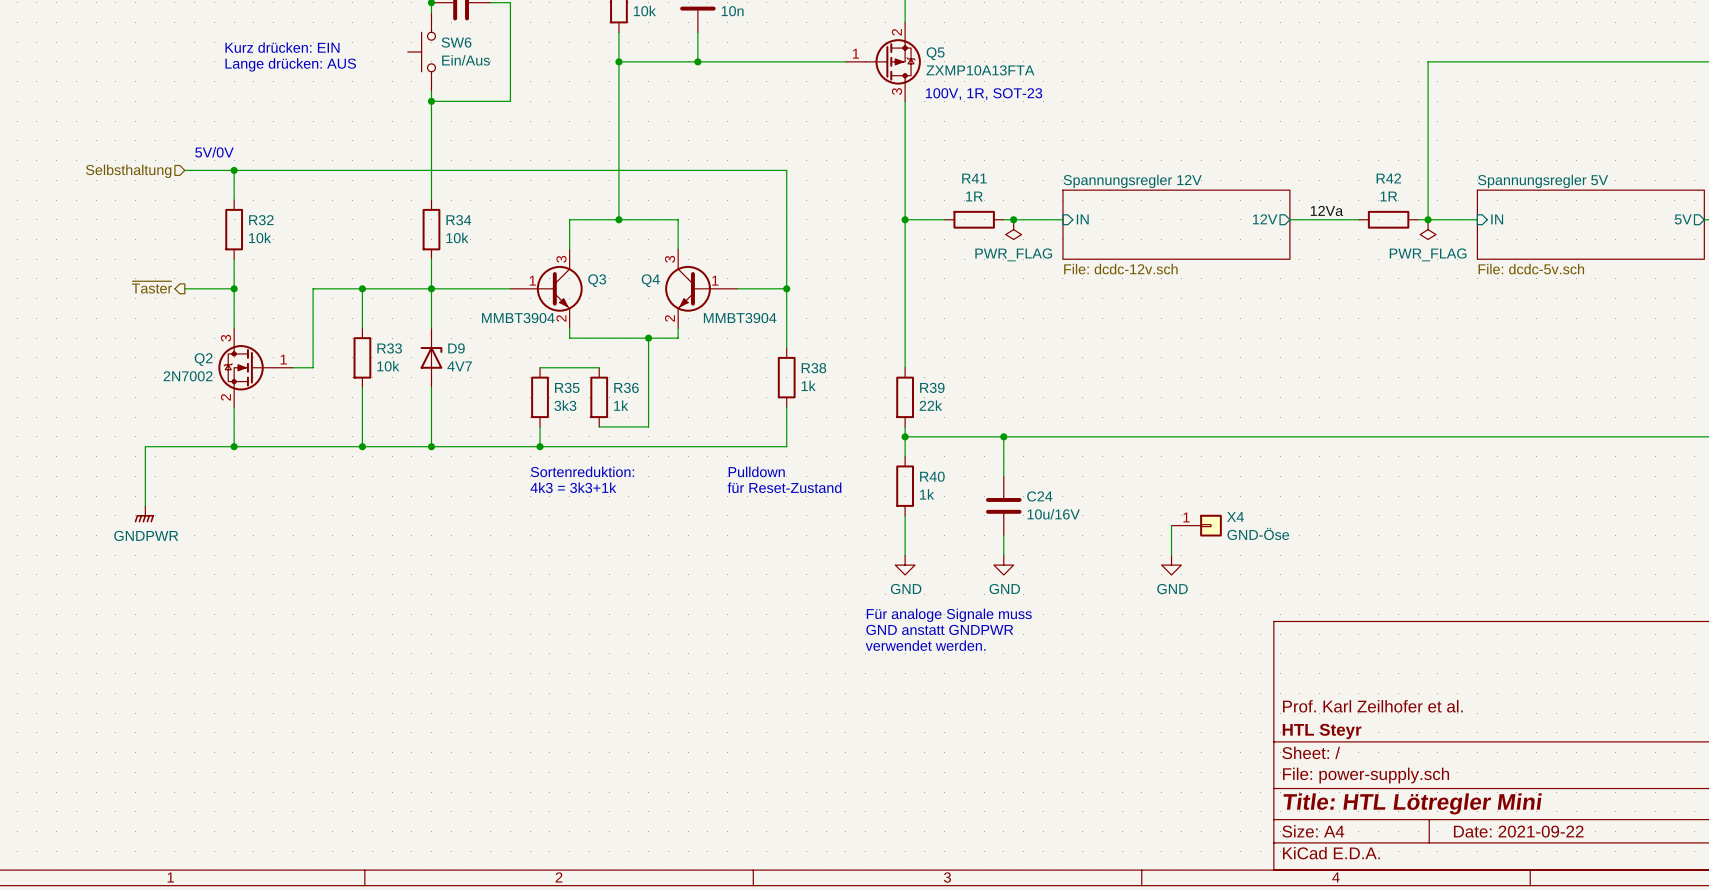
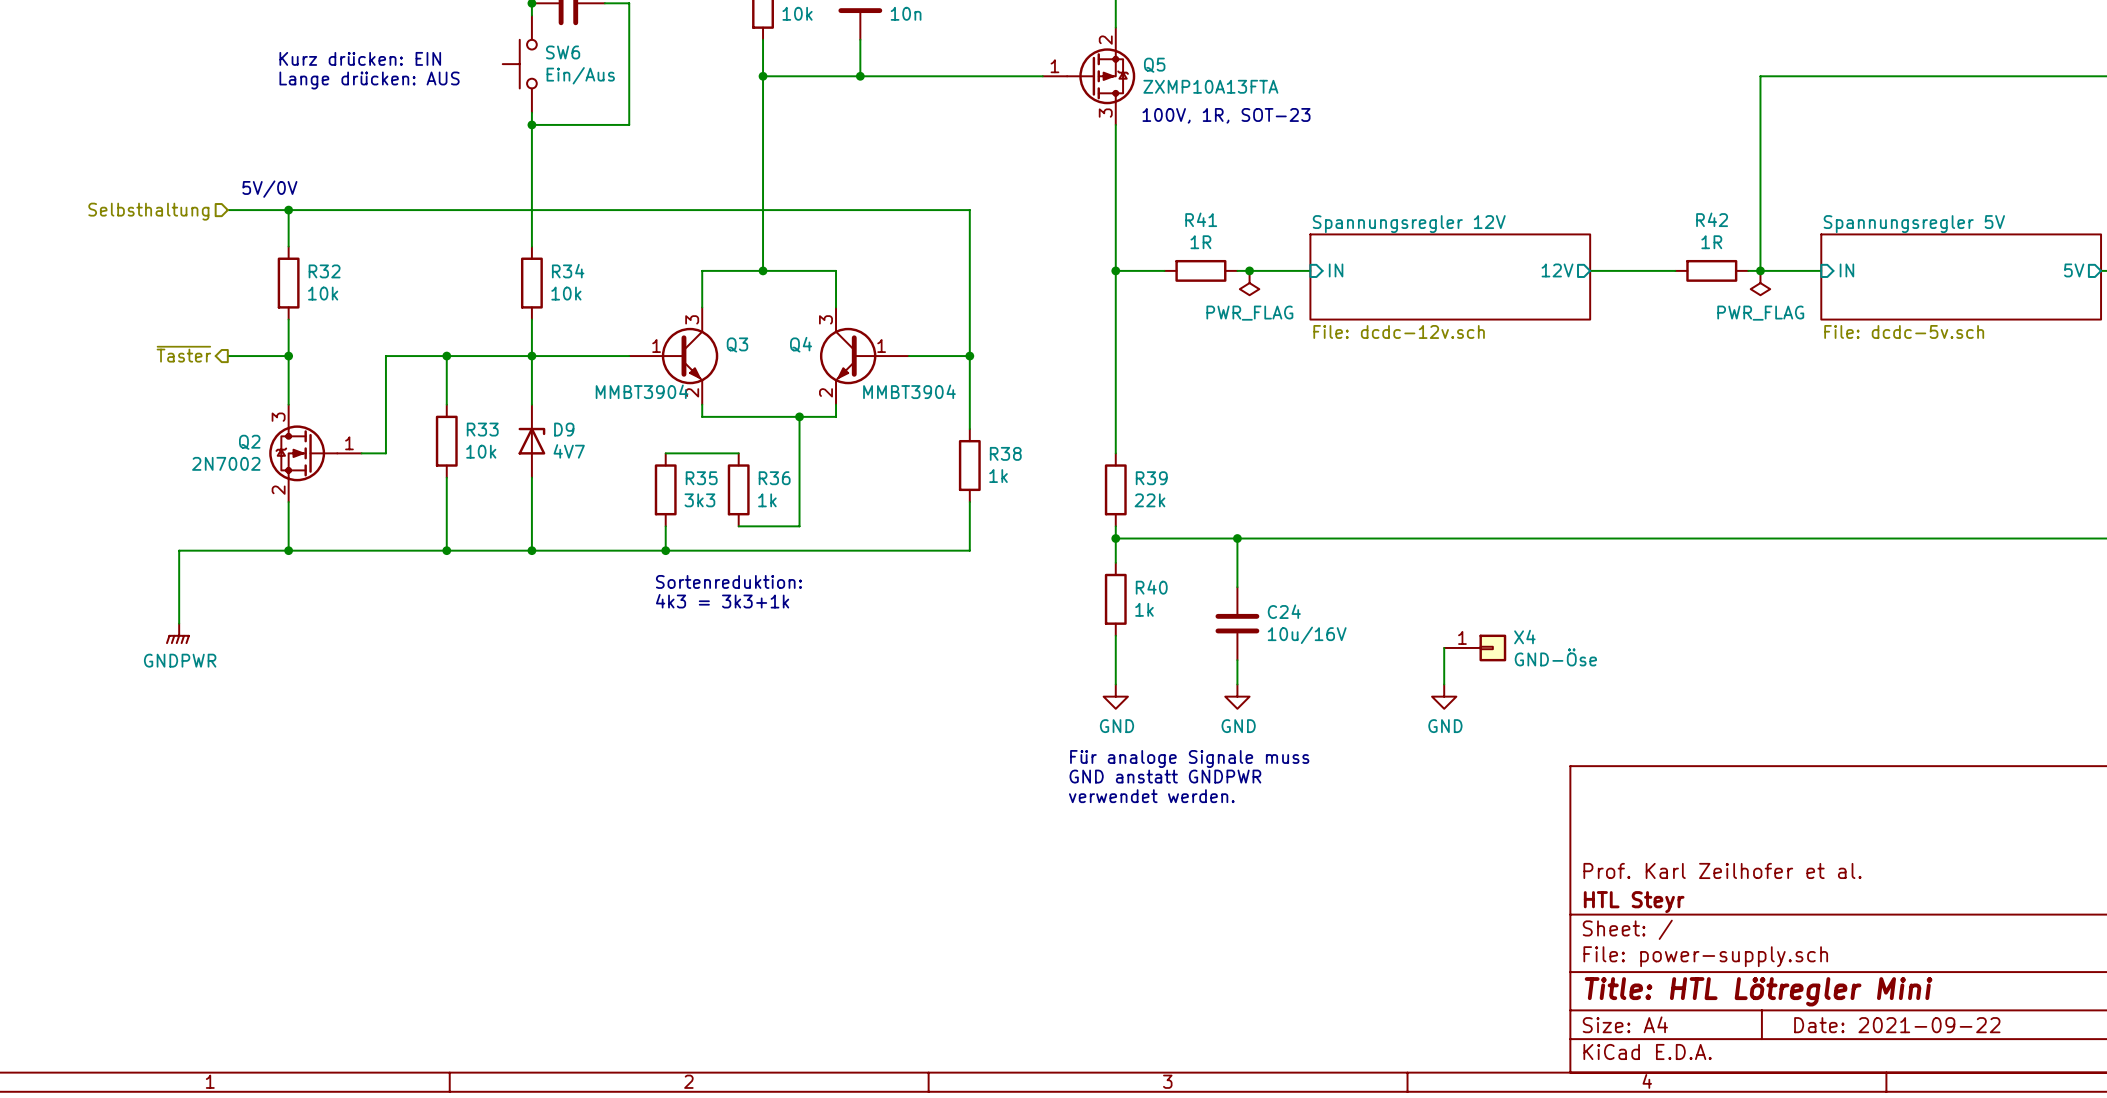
label: 12Va (1326, 210) -> none
text: Pulldown (756, 471) -> none
text: für Reset-Zustand (784, 487) -> none

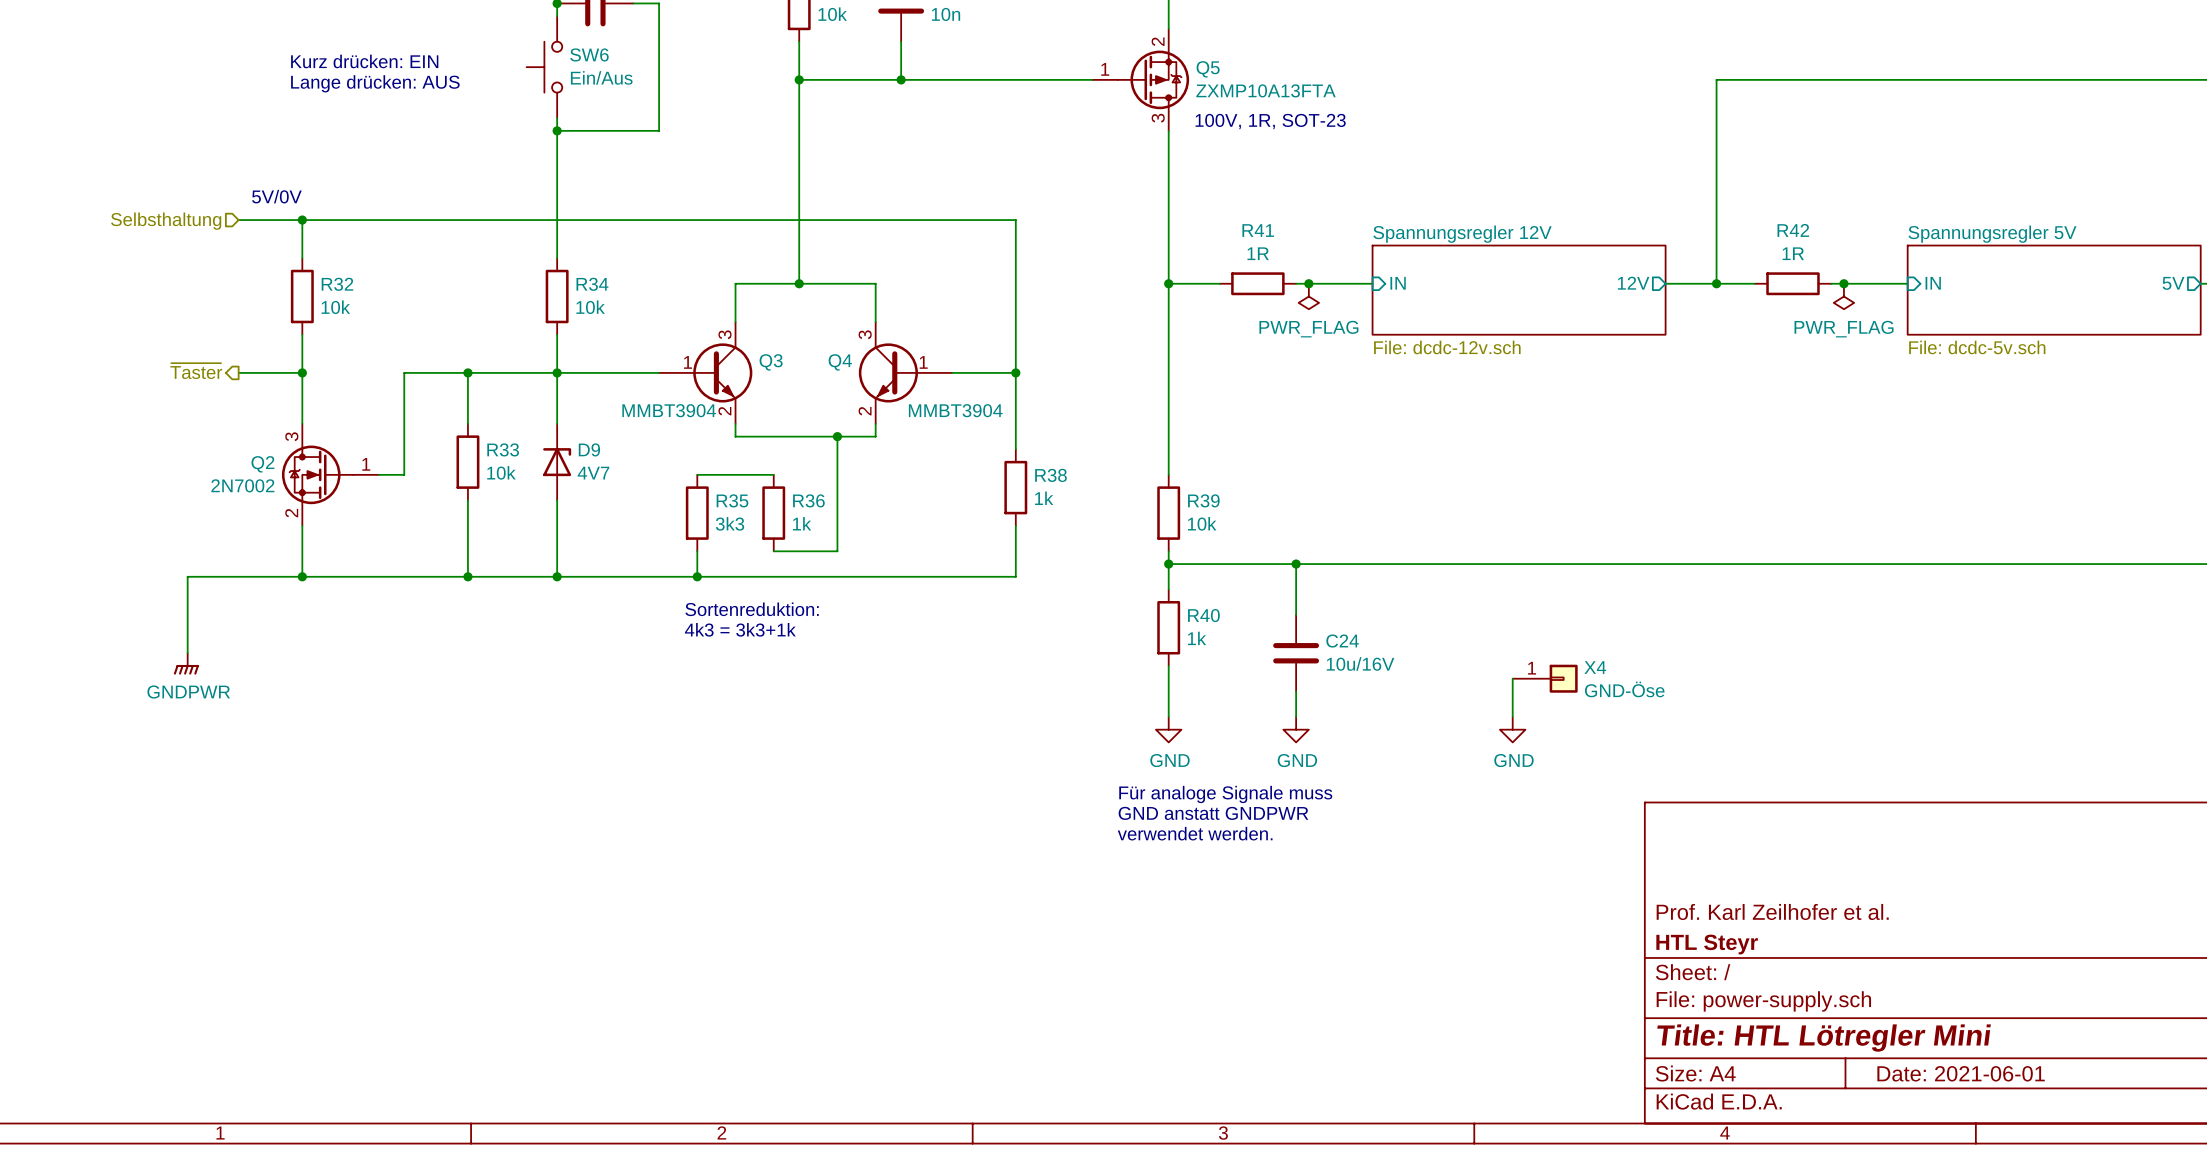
wire: (1760, 76) (1760, 270) -> (1843, 79) (1716, 79) (1716, 283)
junction: none -> (1716, 283)
R39 value: 22k (1149, 500) -> 10k (1202, 523)
title block: Date: 2021-09-22 (1897, 1025) -> Date: 2021-06-01 (1961, 1073)

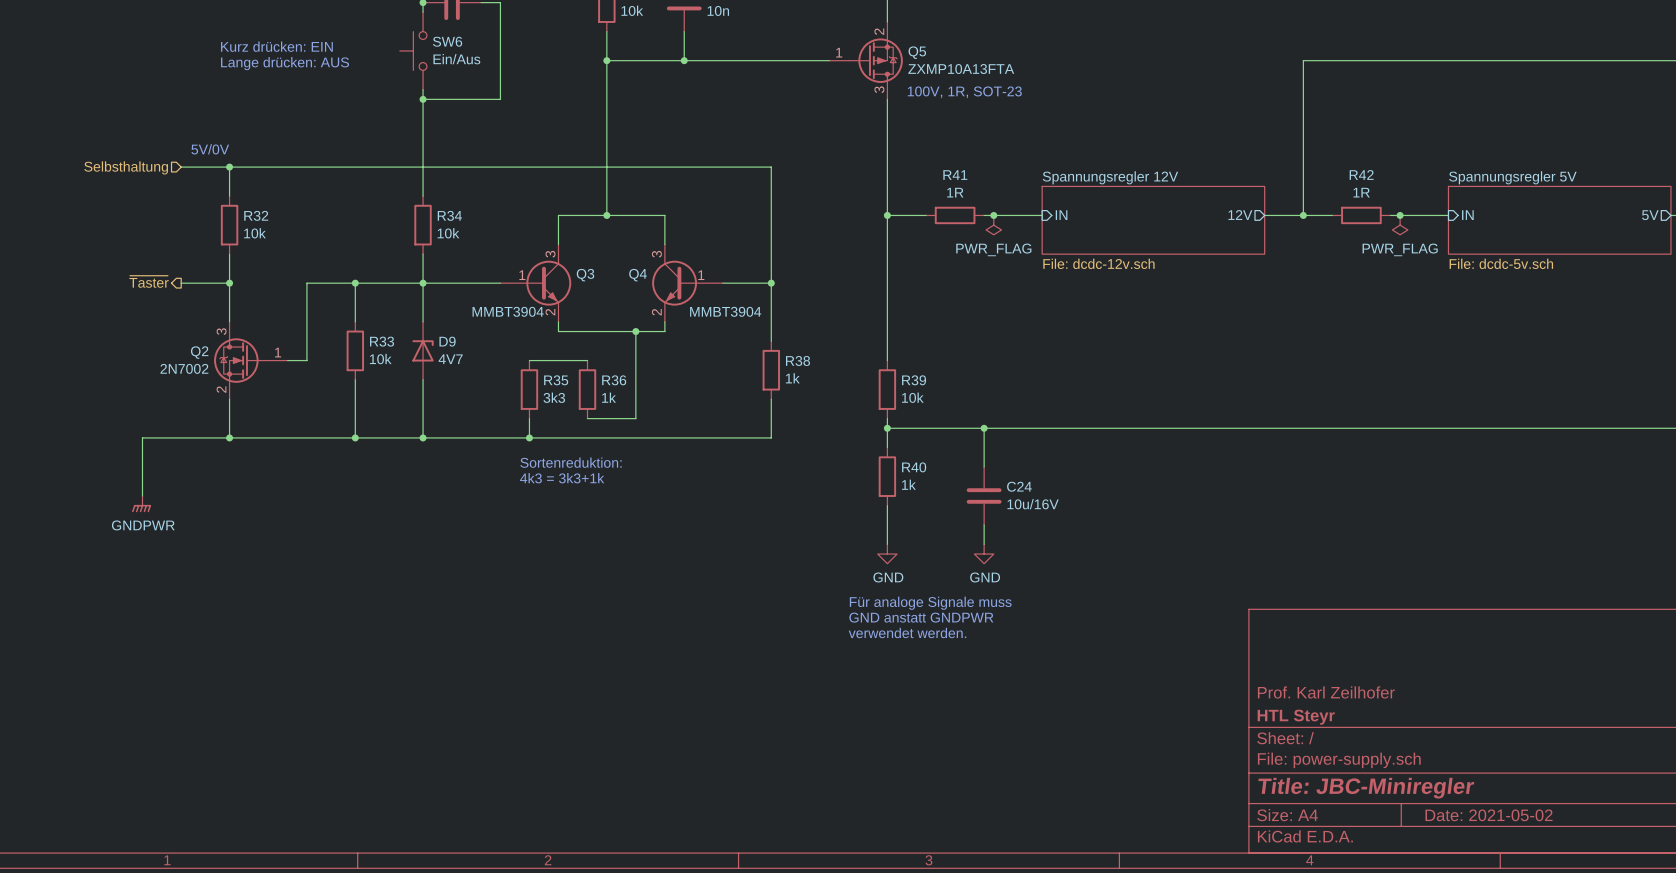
wire: (1512, 678) (1512, 716) -> none
X4: GND-Öse (1545, 678) -> none
power symbol: GND (1512, 729) -> none
title block: Prof. Karl Zeilhofer et al. (1772, 911) -> Prof. Karl Zeilhofer (1326, 692)
title block: Title: HTL Lötregler Mini (1824, 1038) -> Title: JBC-Miniregler (1366, 788)
title block: Date: 2021-06-01 (1961, 1073) -> Date: 2021-05-02 (1489, 815)

